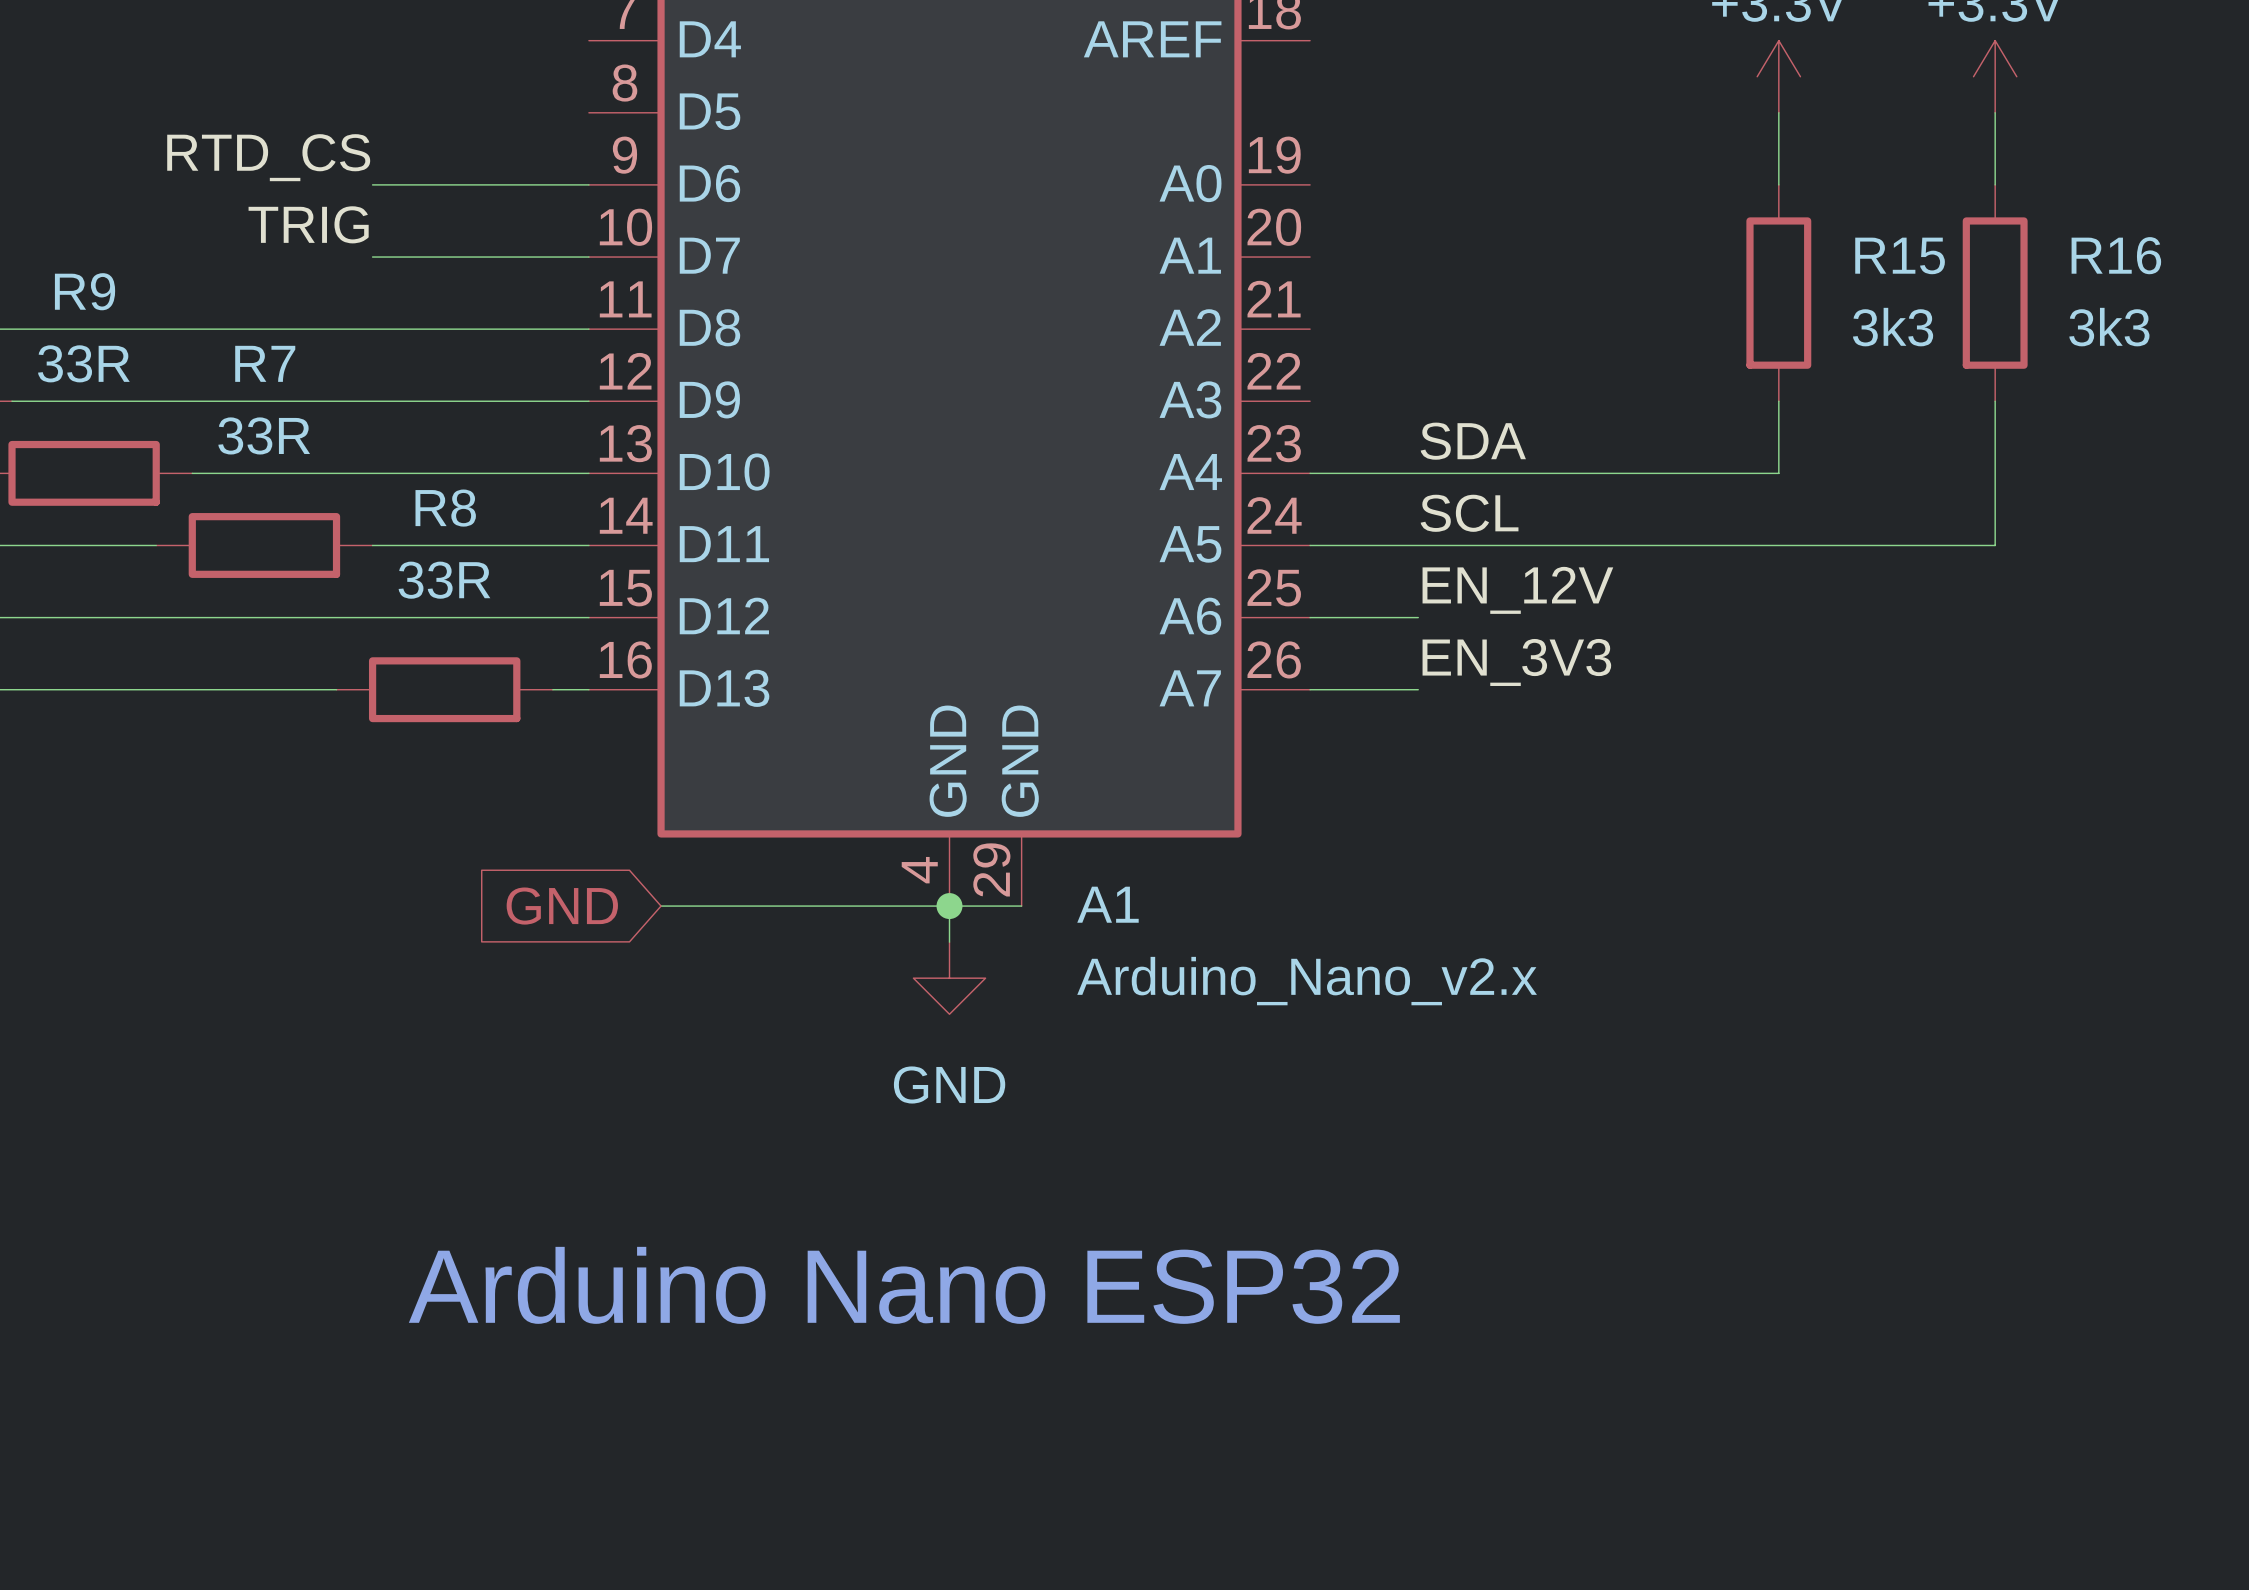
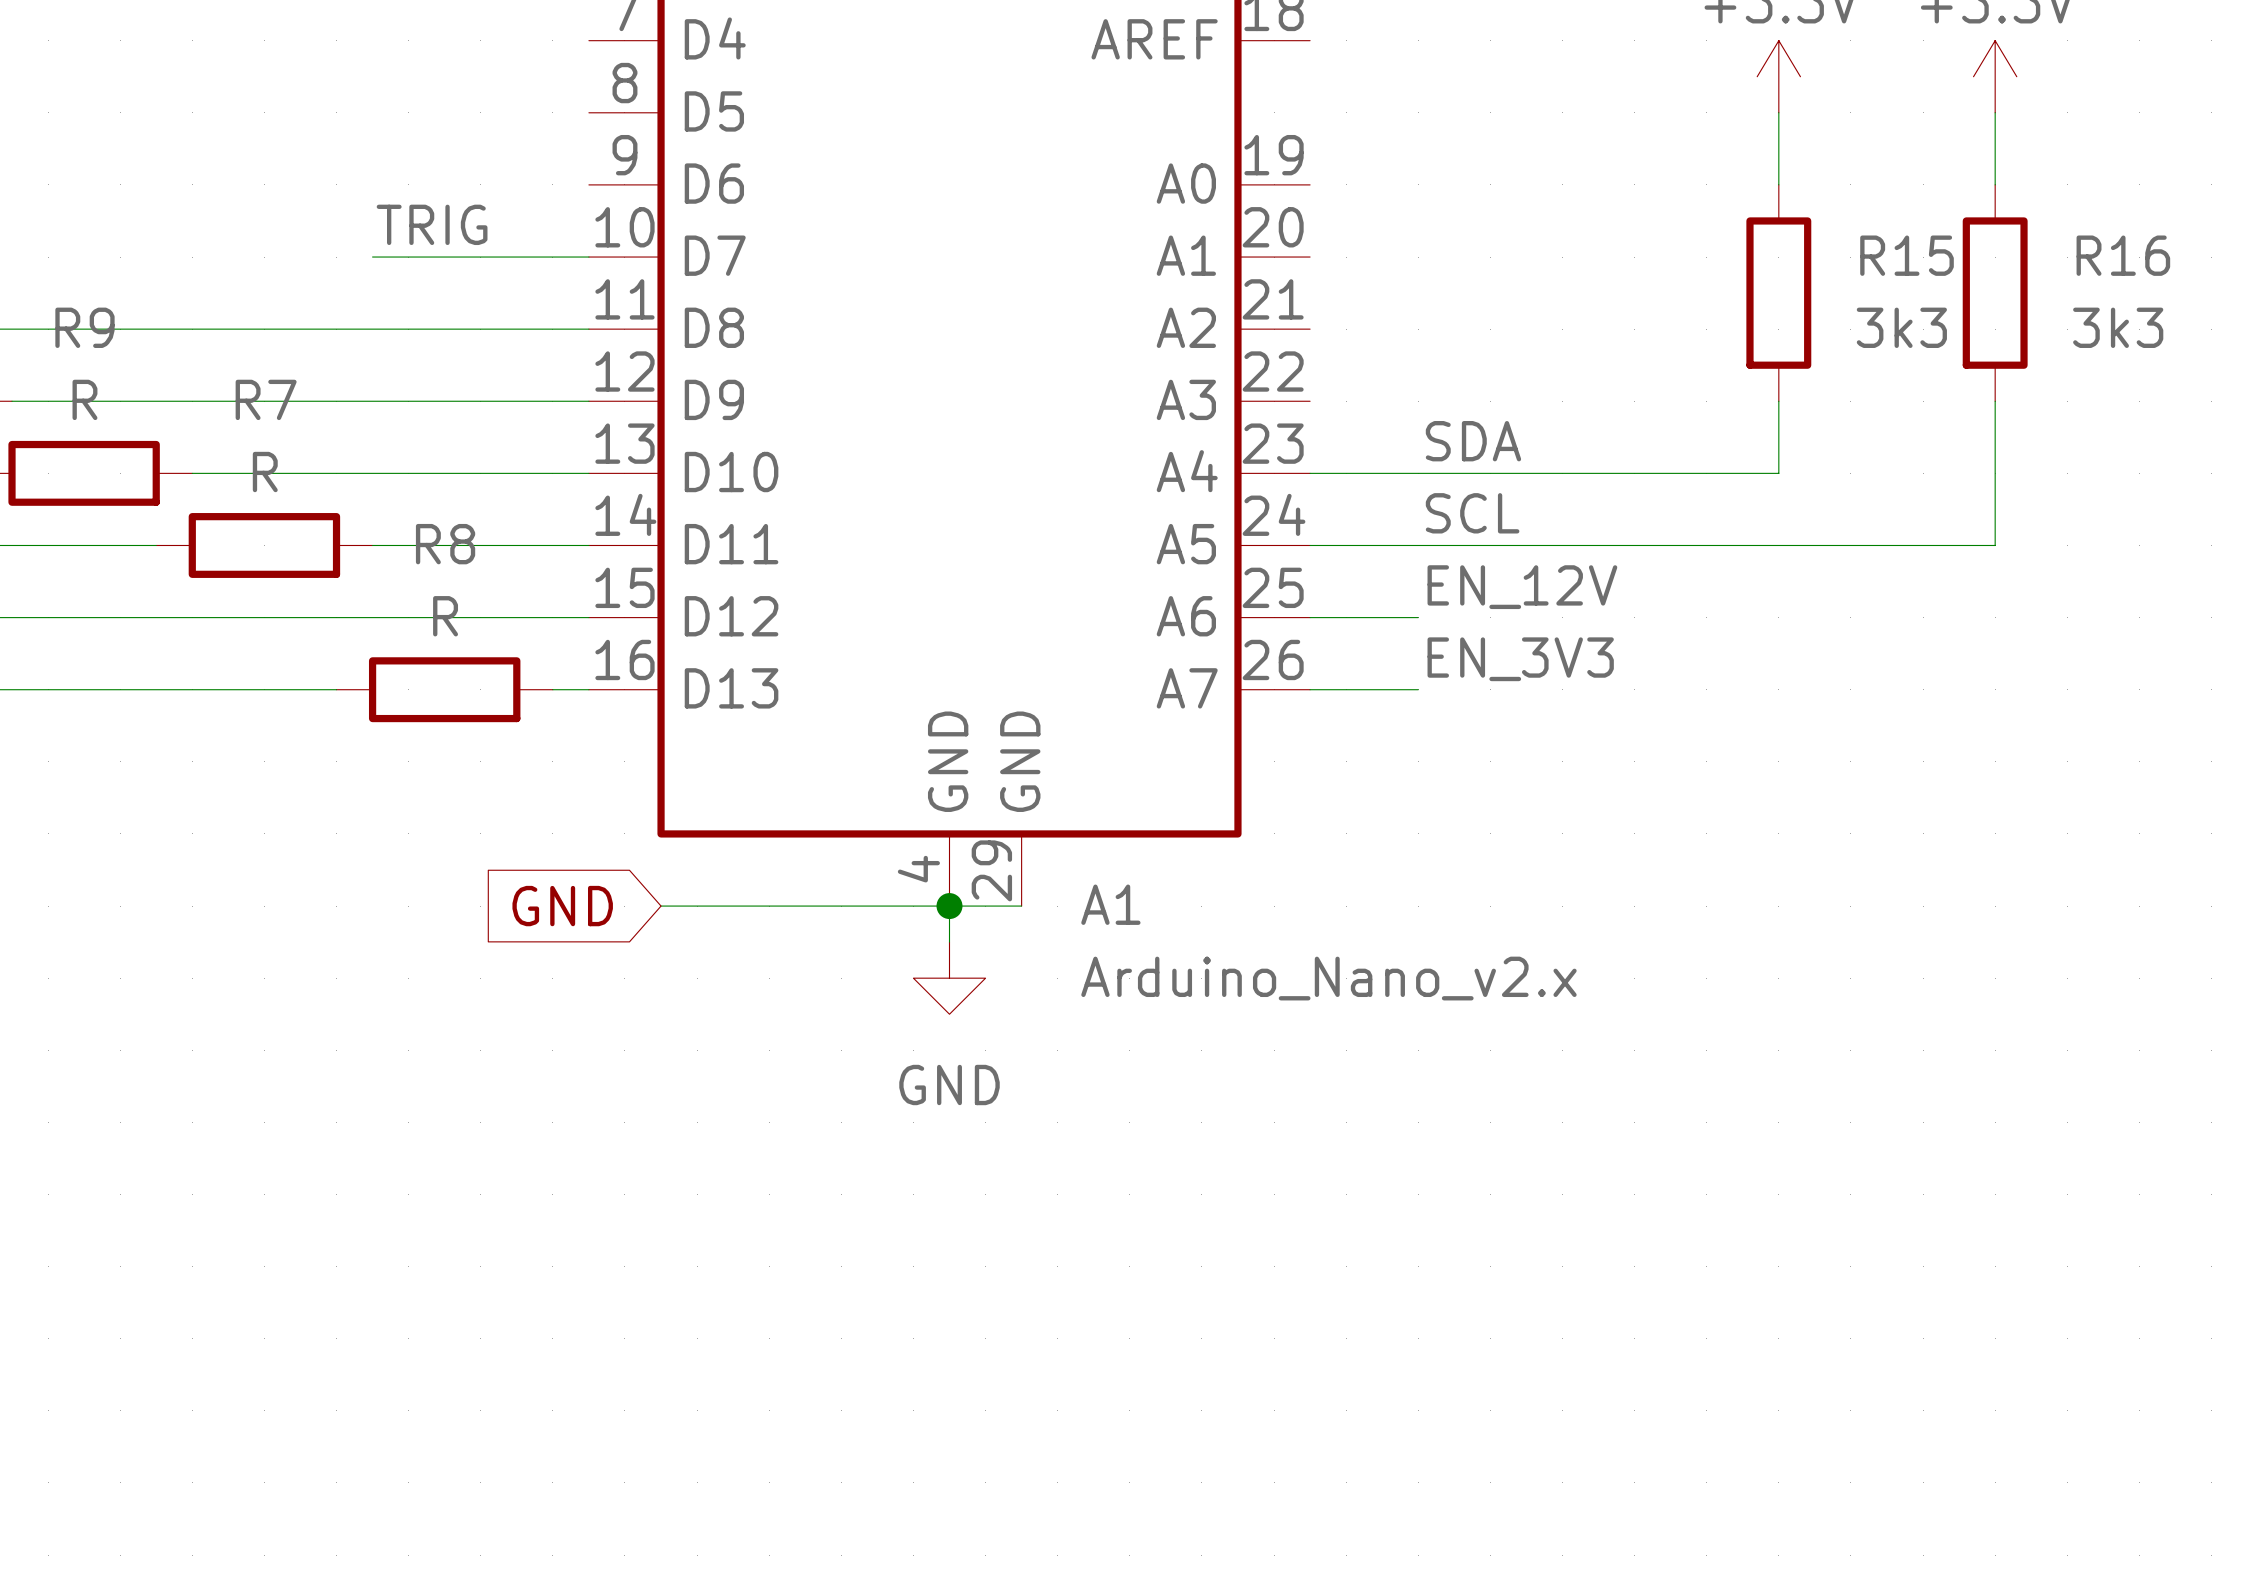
label: RTD_CS (268, 157) -> none
wire: (372, 184) (588, 184) -> none
label position: TRIG (308, 224) -> TRIG (432, 224)
R9 name position: R9 (85, 291) -> R9 (84, 327)
R9 value: 33R (83, 363) -> R (84, 399)
R7 name position: R7 (265, 363) -> R7 (266, 399)
R7 value: 33R (264, 435) -> R (265, 472)
R8 name position: R8 (445, 508) -> R8 (445, 544)
R8 value: 33R (444, 580) -> R (445, 616)
text: Arduino Nano ESP32 (904, 1285) -> none

